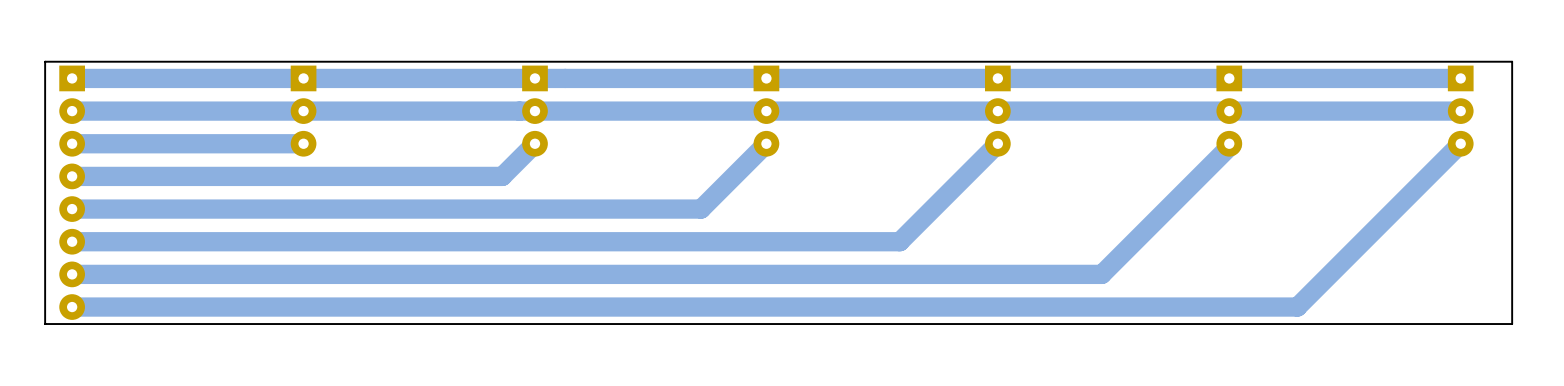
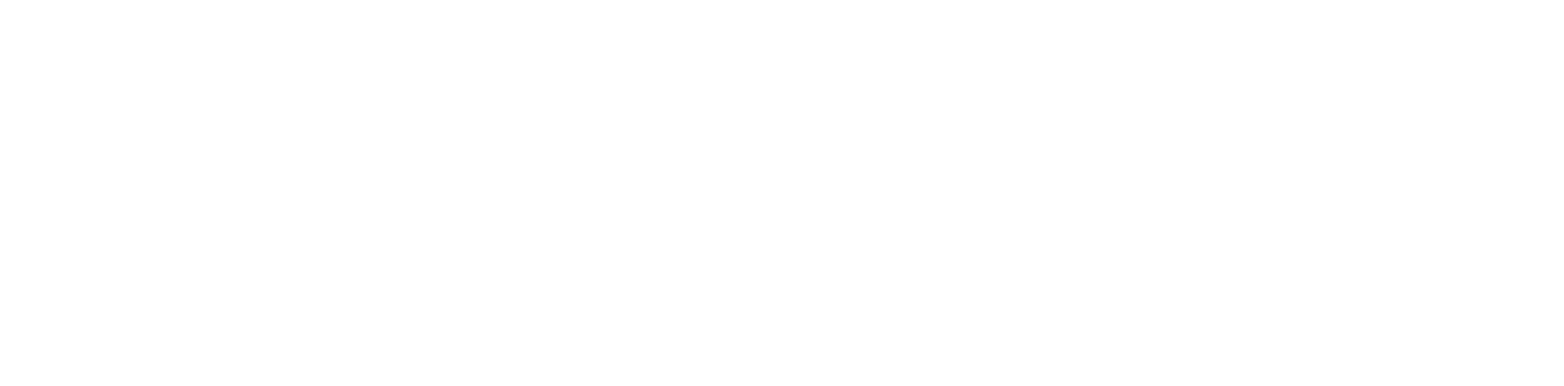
board edge: (1512, 61) (45, 61) (45, 324) (1512, 324) (1512, 61) -> none
track: (1229, 78) (72, 78) -> none
track: (1460, 78) (1230, 78) -> none
part: (303, 111) -> none
part: (534, 111) -> none
part: (766, 111) -> none
part: (997, 111) -> none
part: (1229, 111) -> none
track: (1460, 111) (72, 111) -> none
part: (1460, 111) -> none
track: (303, 143) (72, 143) -> none
track: (534, 143) (502, 176) (72, 176) -> none
track: (766, 143) (701, 209) (72, 209) -> none
track: (997, 143) (899, 241) (72, 241) -> none
track: (1232, 143) (1101, 274) (72, 274) -> none
track: (1460, 143) (1297, 307) (72, 307) -> none
part: (72, 192) -> none

